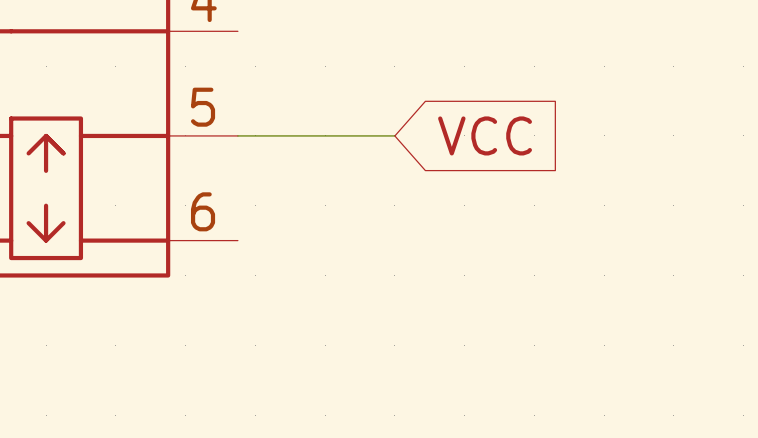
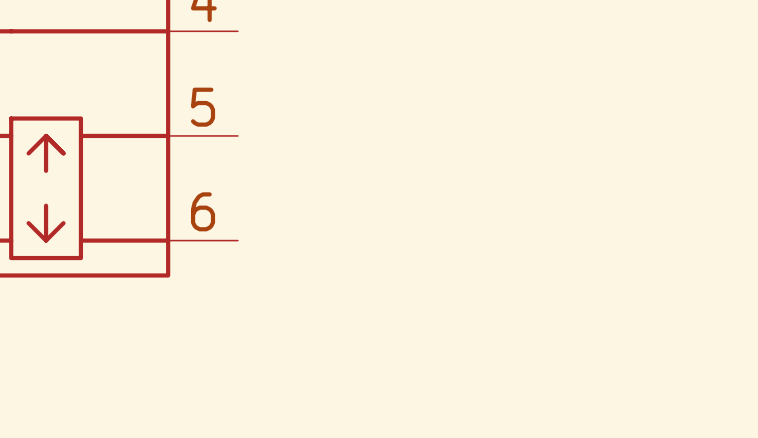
wire: (237, 135) (394, 135) -> none
global label: VCC (485, 135) -> none

